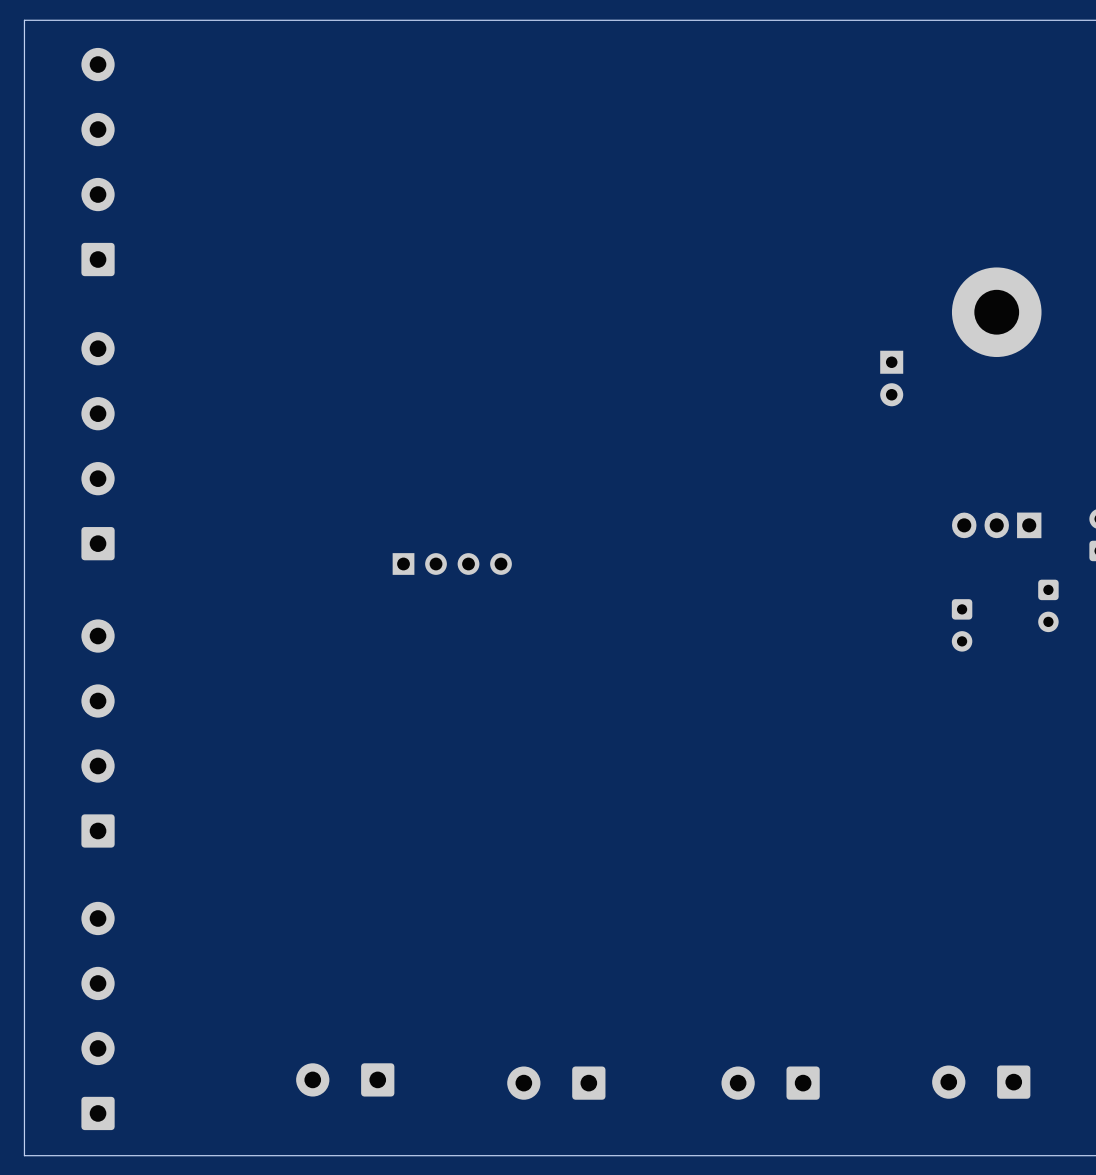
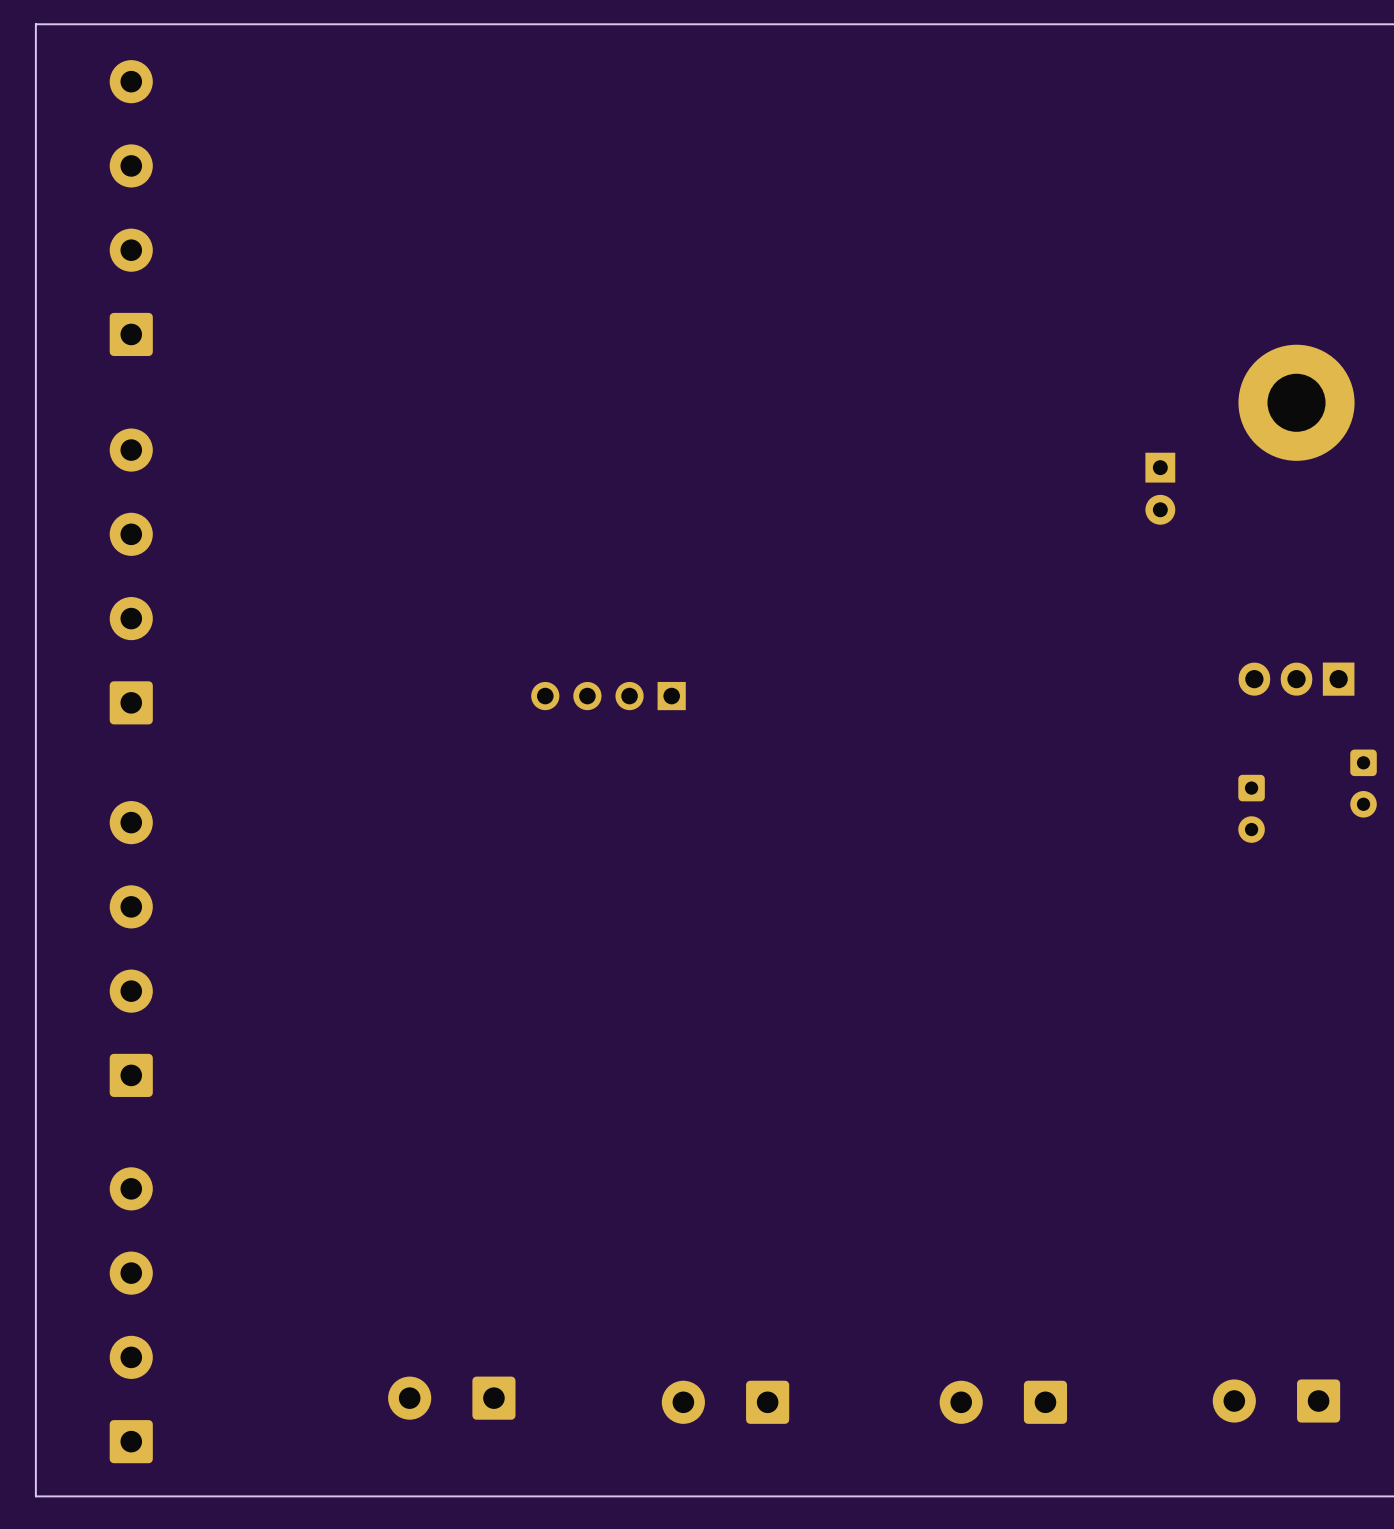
part rotation: 0° (452, 564) -> 180° (608, 696)

